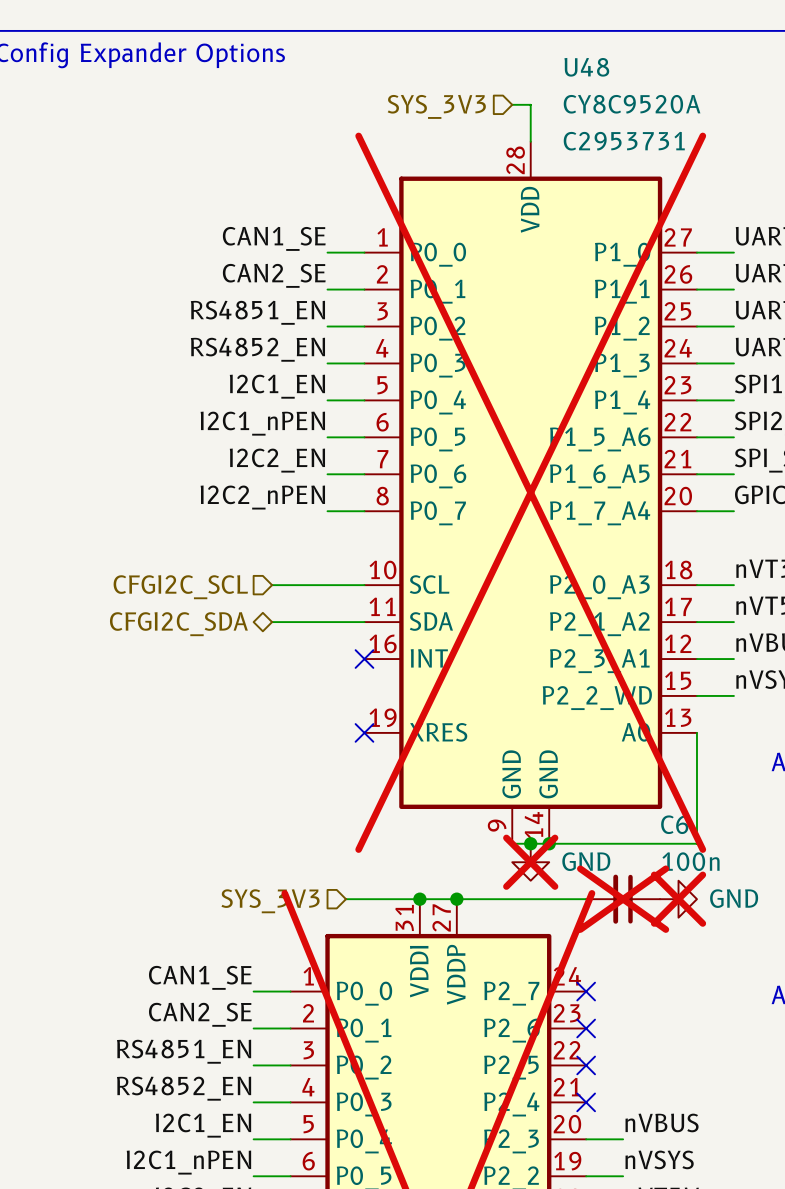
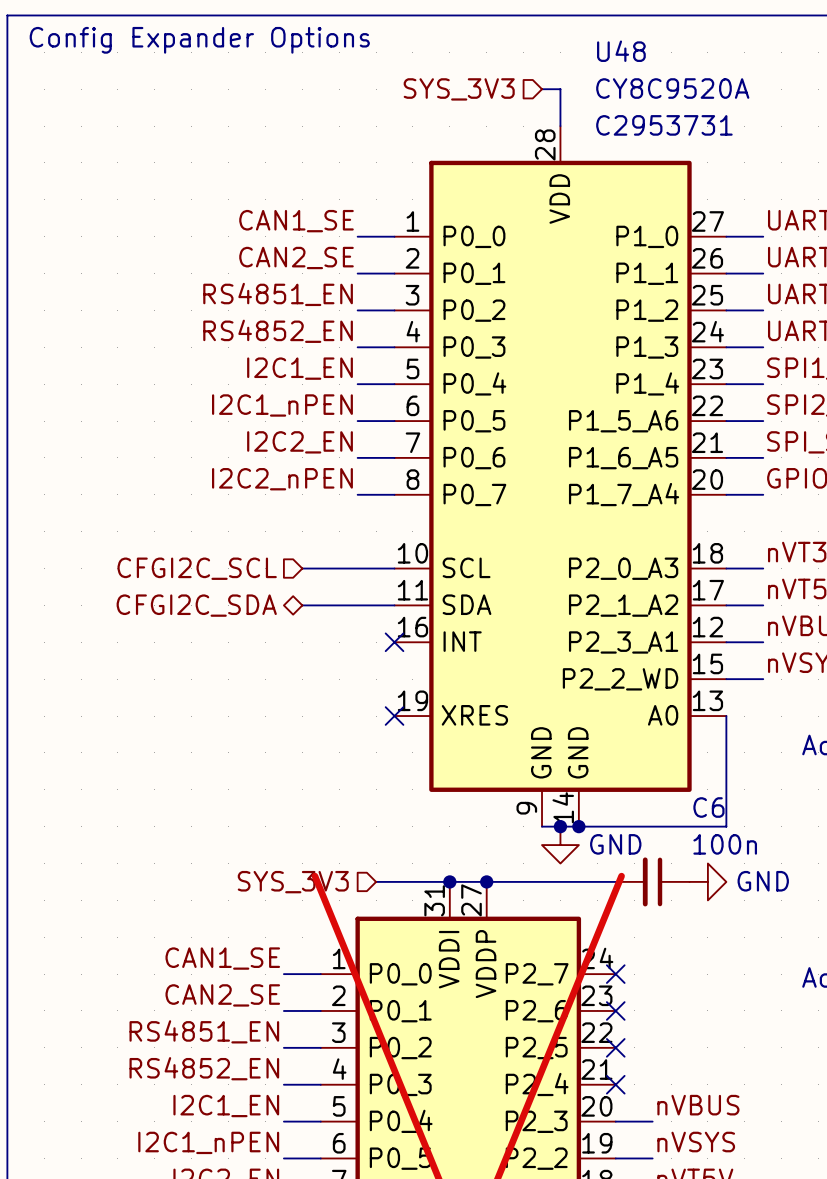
U48 do-not-place cross: (530, 492) -> none
power symbol do-not-place cross: (530, 862) -> none
C6 do-not-place cross: (623, 899) -> none
power symbol do-not-place cross: (678, 899) -> none

